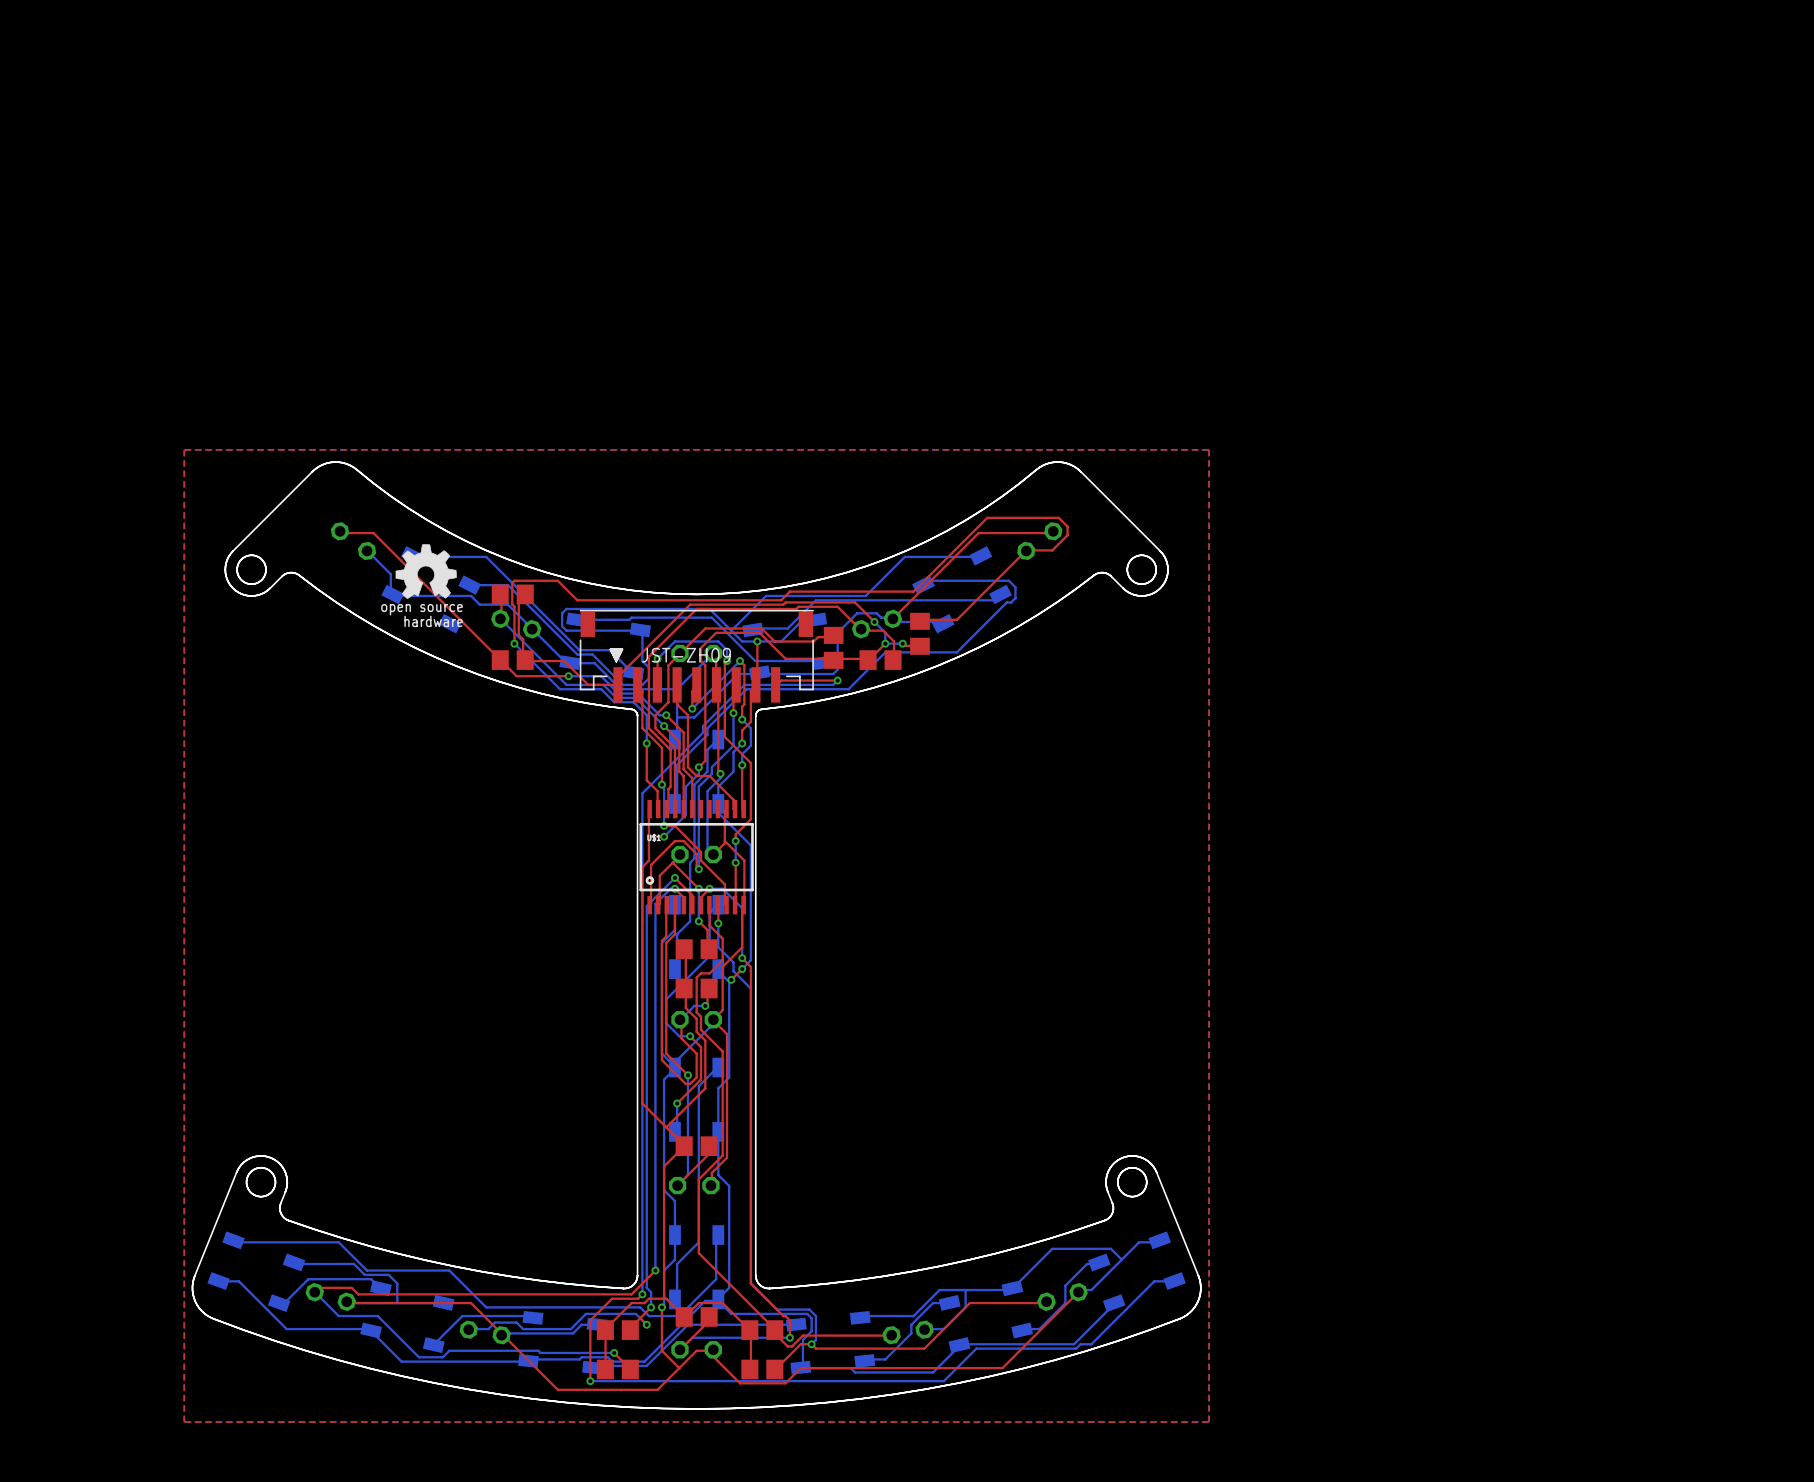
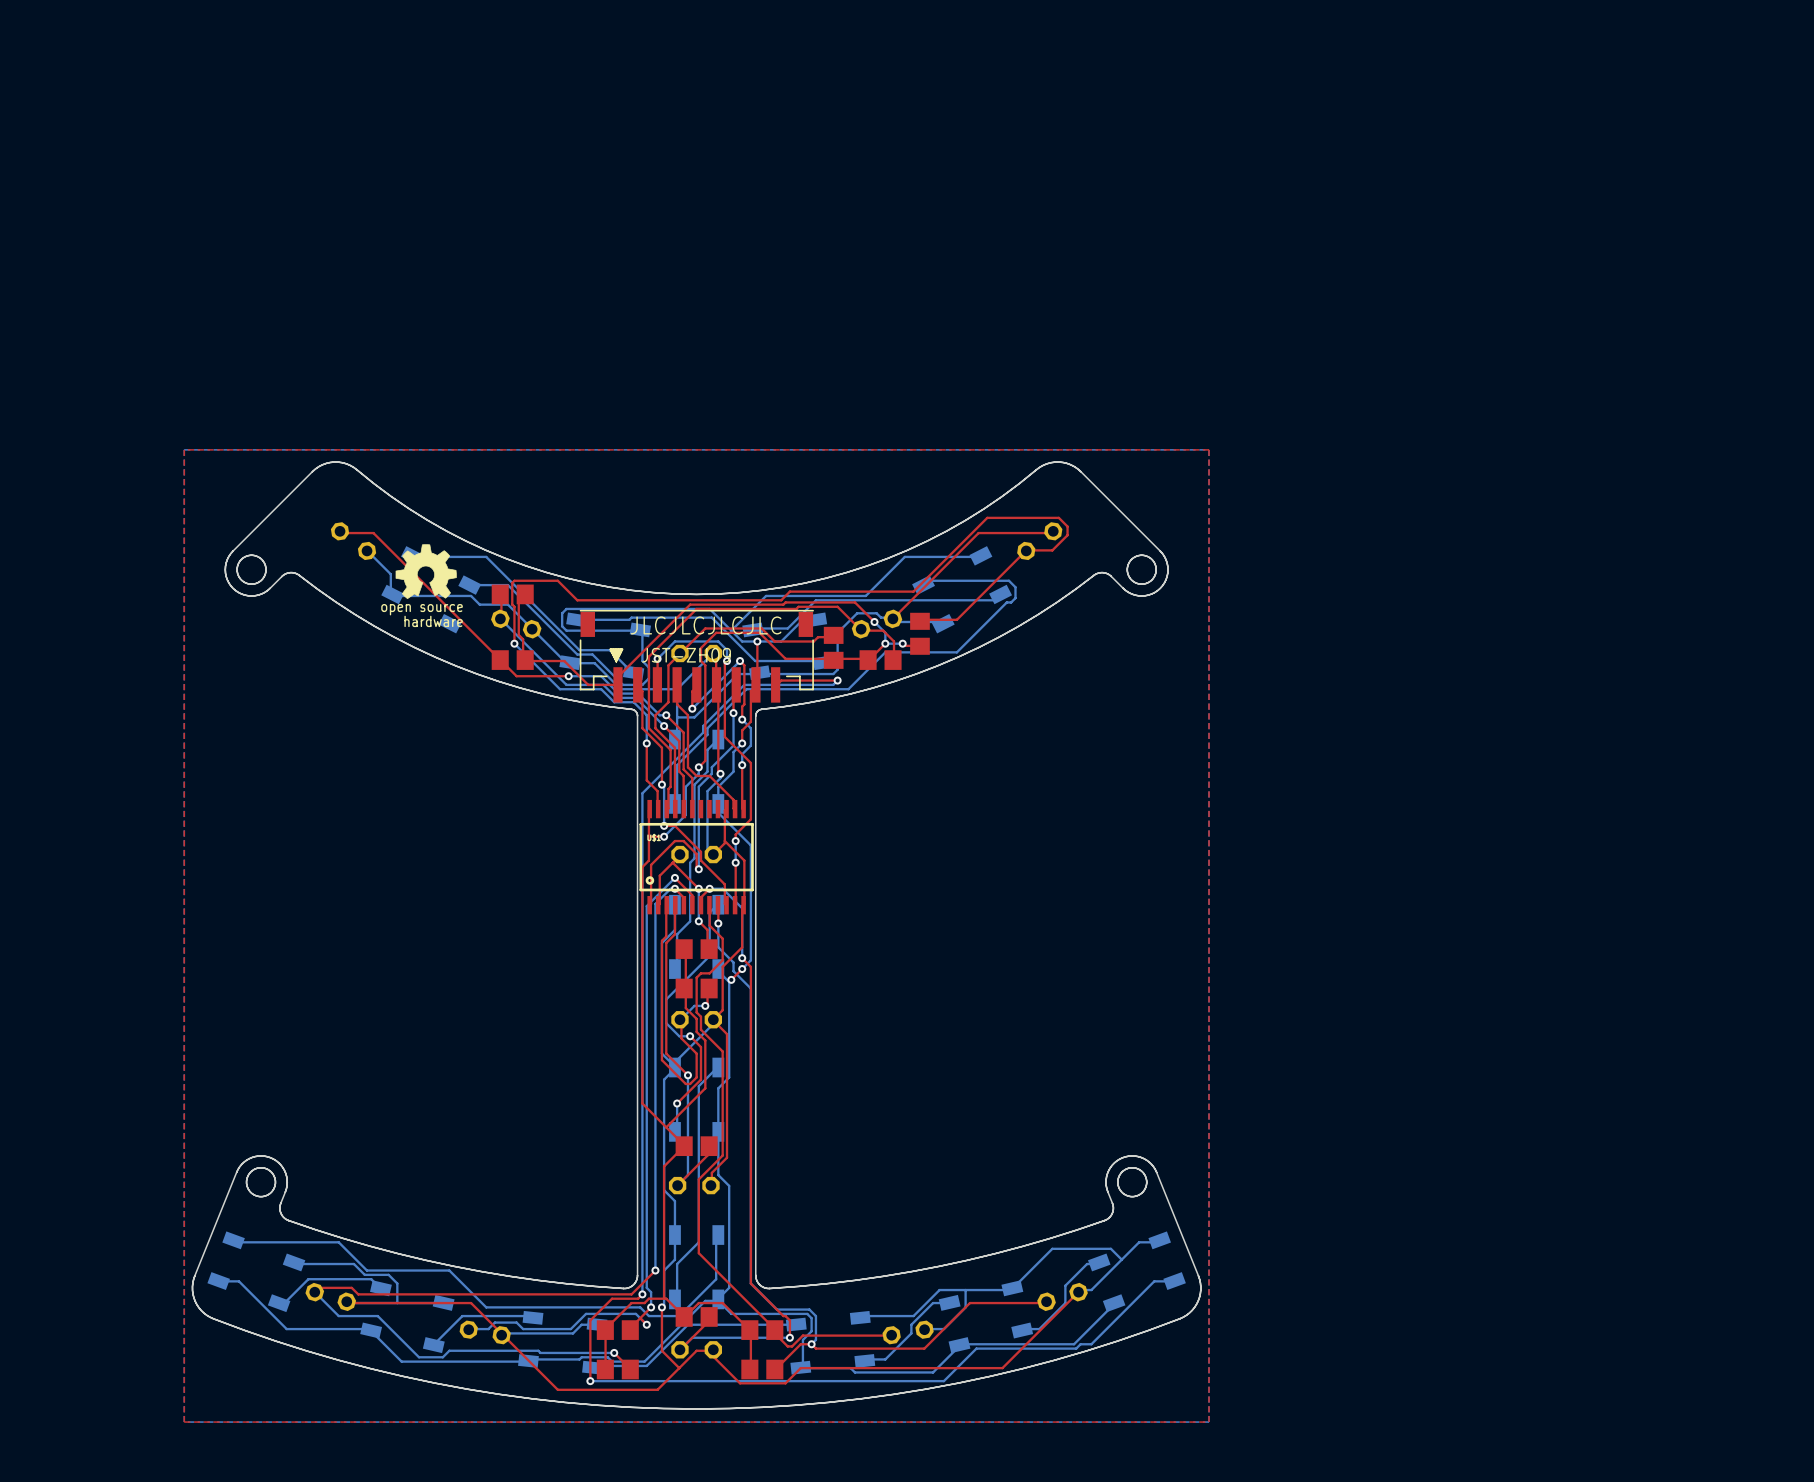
text: none -> JLCJLCJLCJLC (706, 625)

